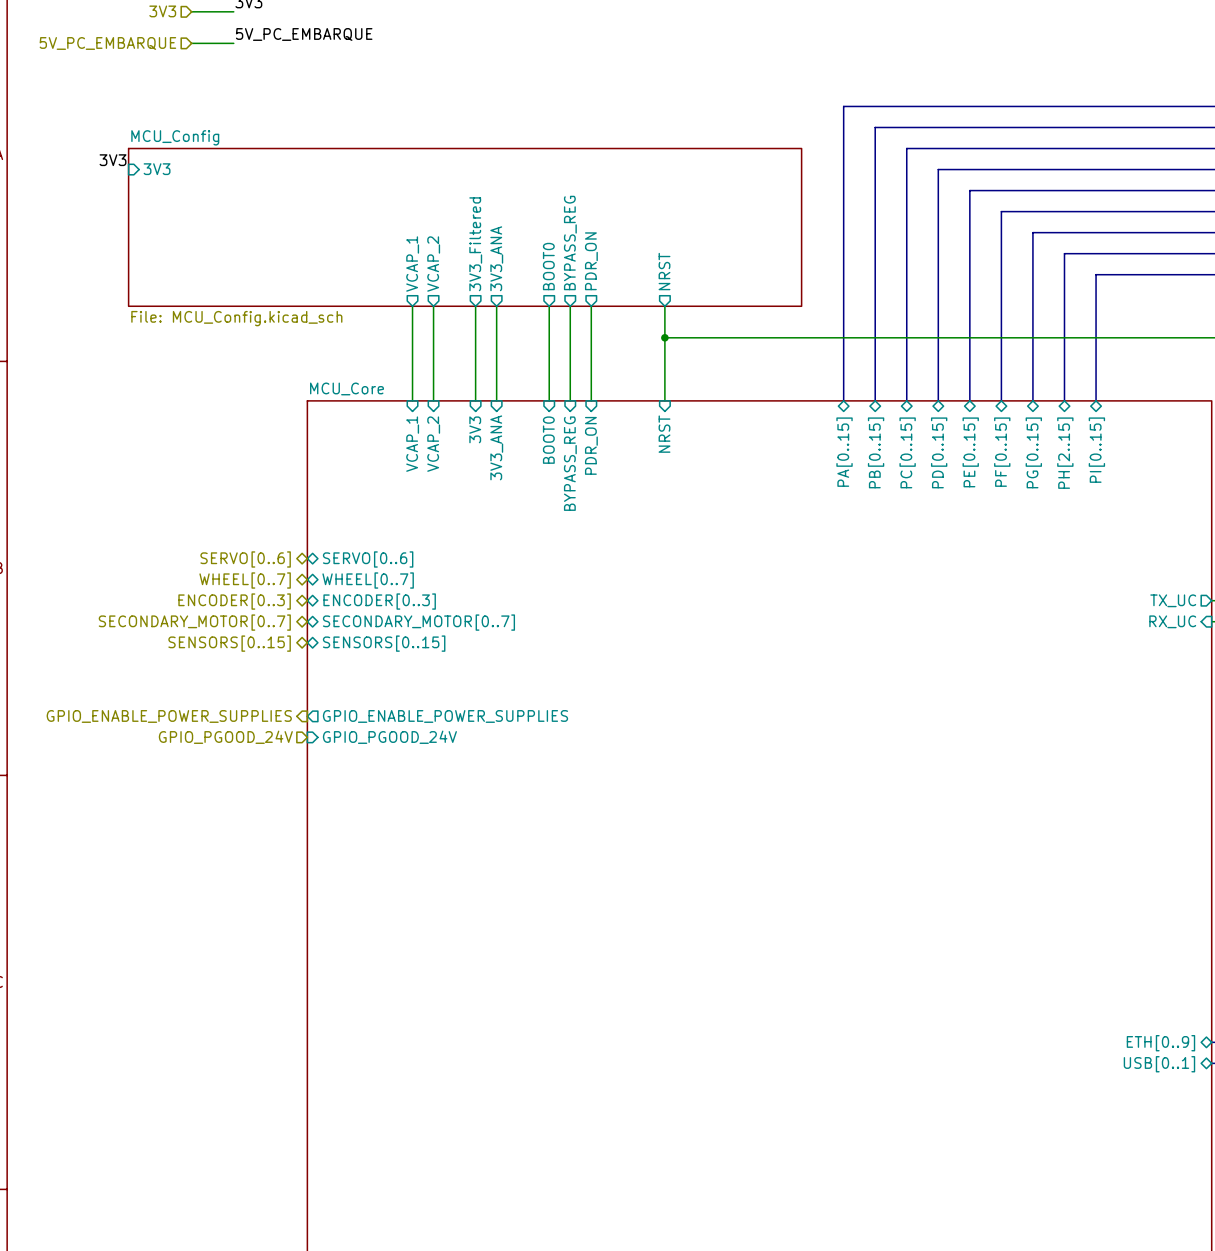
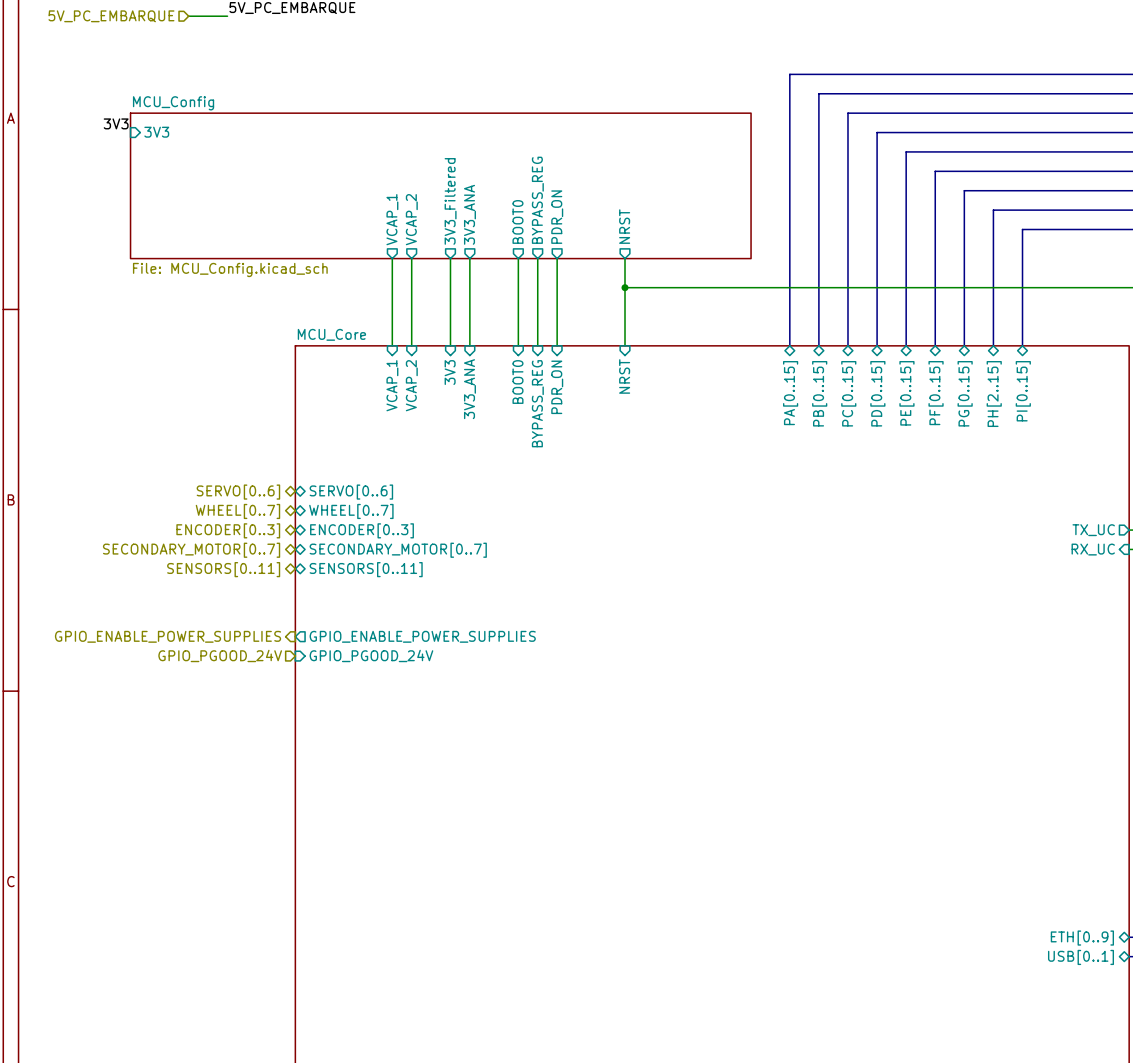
hierarchical label: SENSORS[0..15] (229, 643) -> SENSORS[0..11] (223, 569)
sheet pin: SENSORS[0..15] (384, 643) -> SENSORS[0..11] (366, 569)

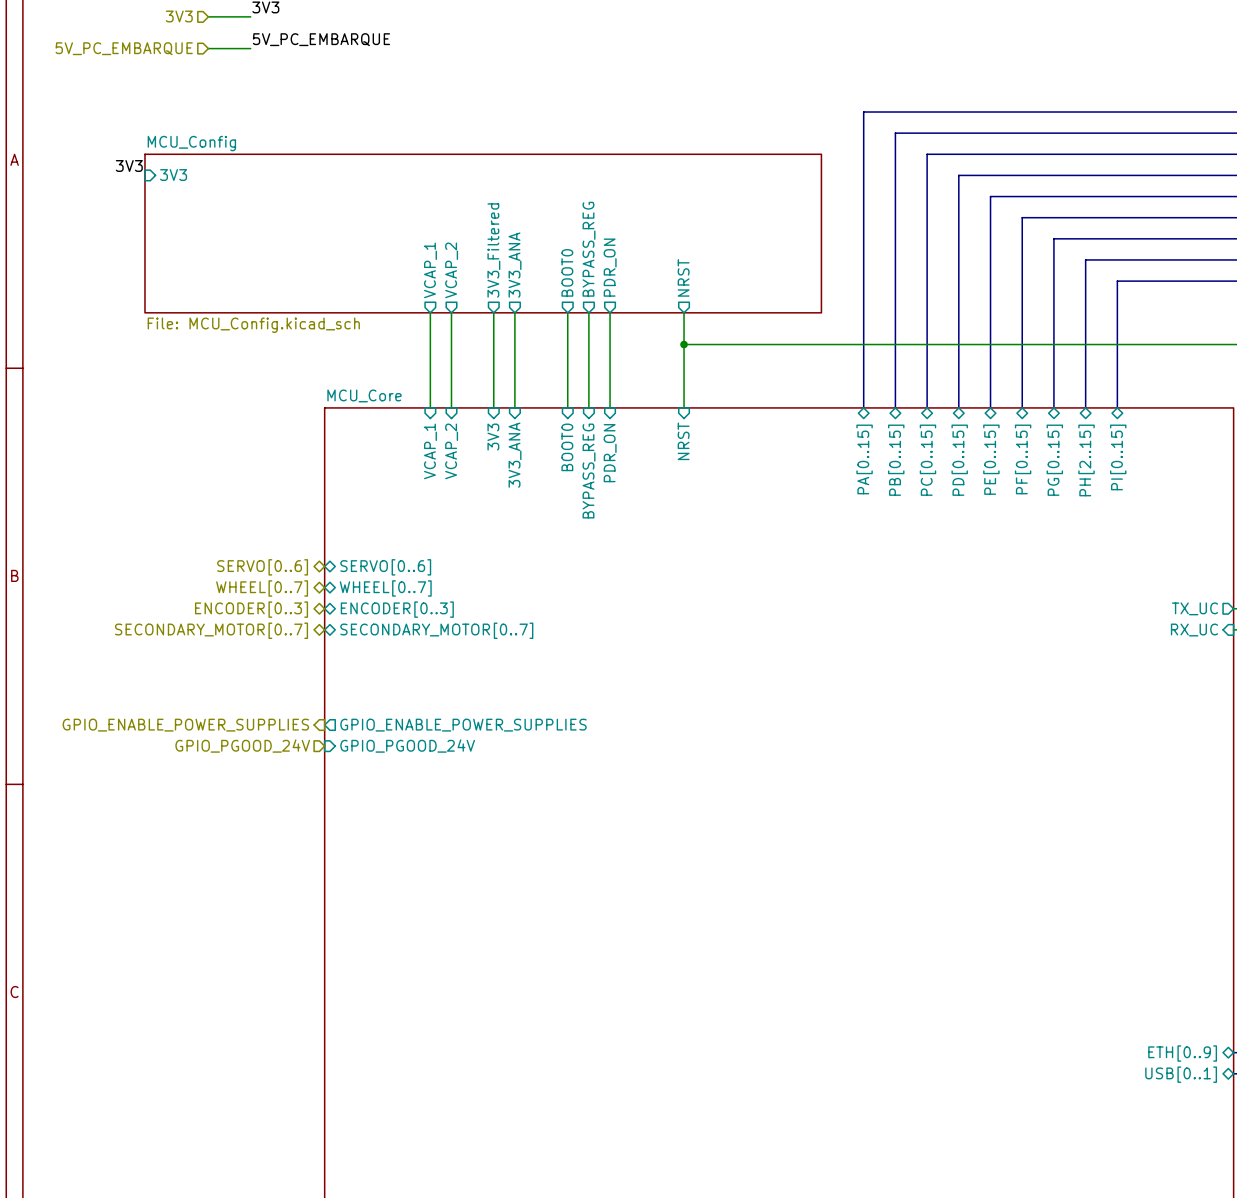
hierarchical label: SENSORS[0..11] (223, 569) -> none
sheet pin: SENSORS[0..11] (366, 569) -> none

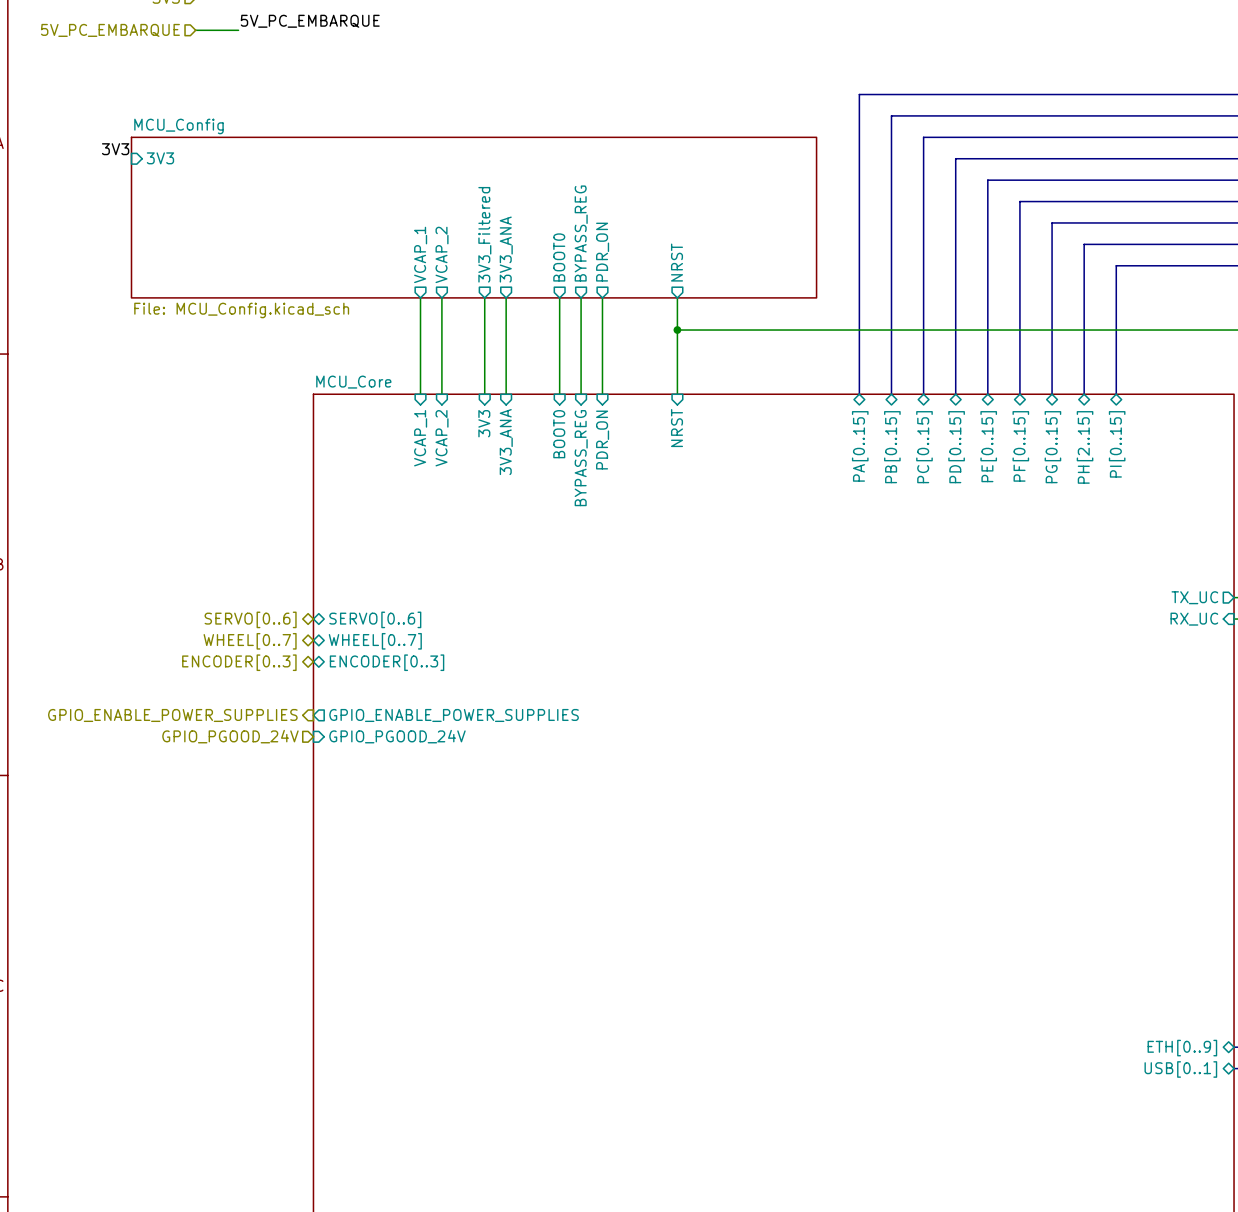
hierarchical label: SERVO[0..6] (262, 567) -> none
sheet pin: SERVO[0..6] (385, 567) -> none
hierarchical label position: WHEEL[0..7] (262, 588) -> WHEEL[0..7] (250, 641)
sheet pin position: WHEEL[0..7] (385, 588) -> WHEEL[0..7] (375, 641)
hierarchical label position: ENCODER[0..3] (251, 609) -> ENCODER[0..3] (239, 662)
sheet pin position: ENCODER[0..3] (397, 609) -> ENCODER[0..3] (387, 662)
hierarchical label: SECONDARY_MOTOR[0..7] (211, 630) -> SERVO[0..6] (250, 619)
sheet pin: SECONDARY_MOTOR[0..7] (436, 630) -> SERVO[0..6] (375, 619)

